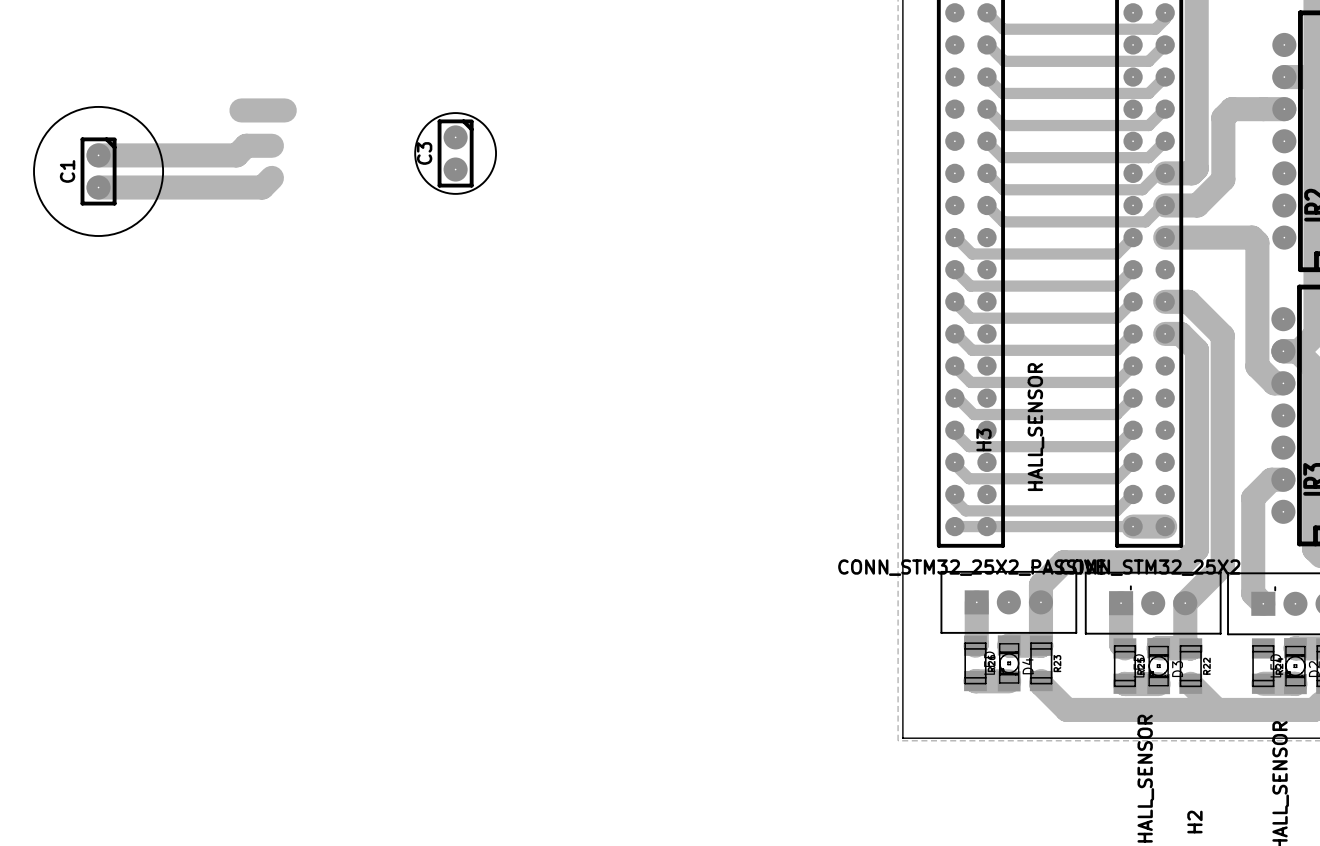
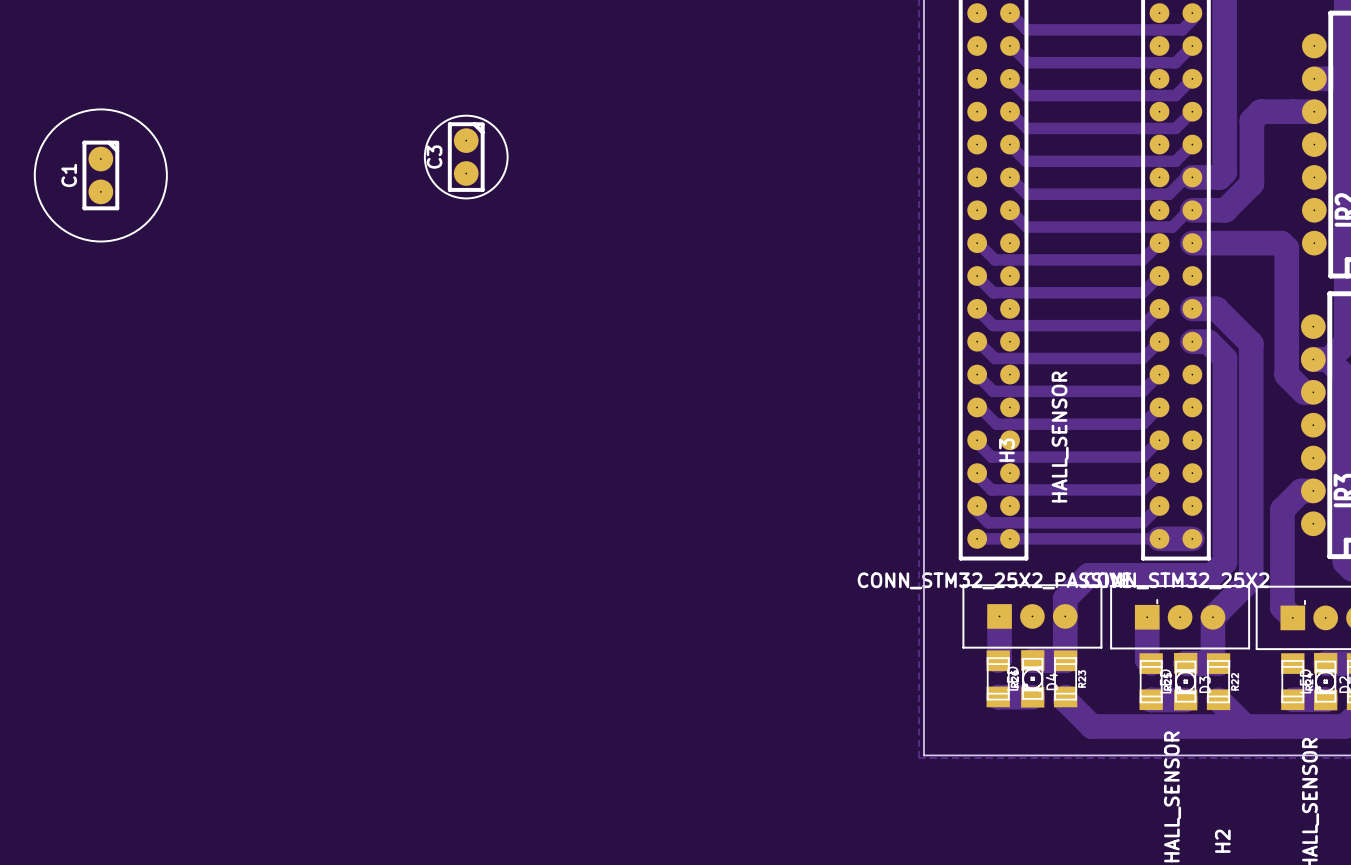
track: (241, 110) (284, 110) -> none
track: (271, 145) (246, 145) (236, 155) (98, 155) -> none
track: (271, 177) (262, 187) (98, 187) -> none

